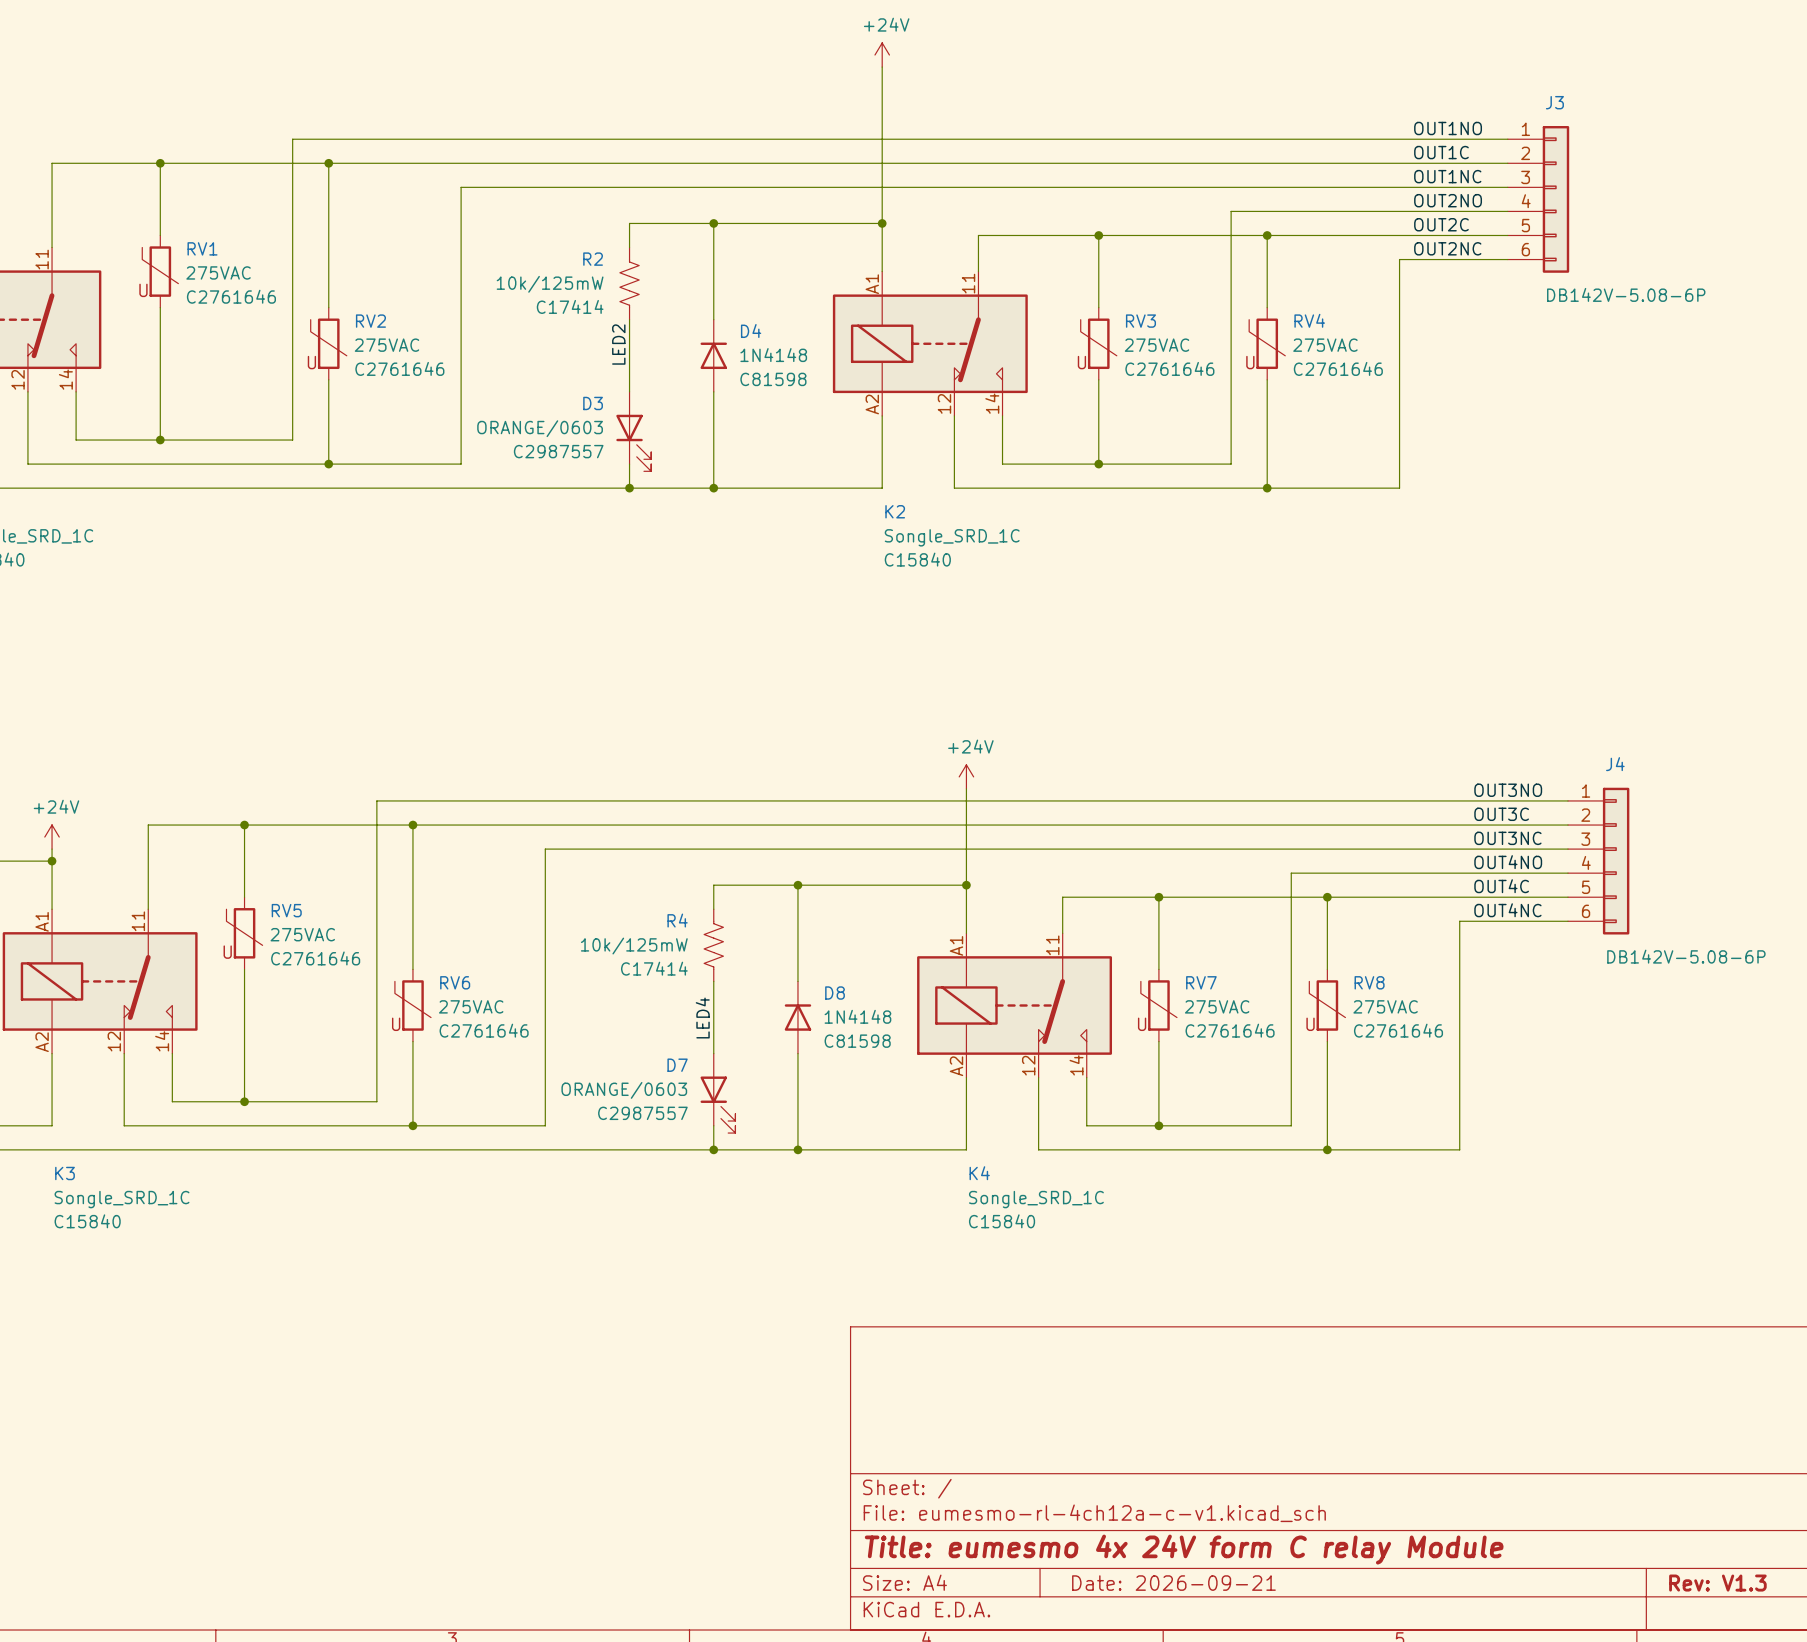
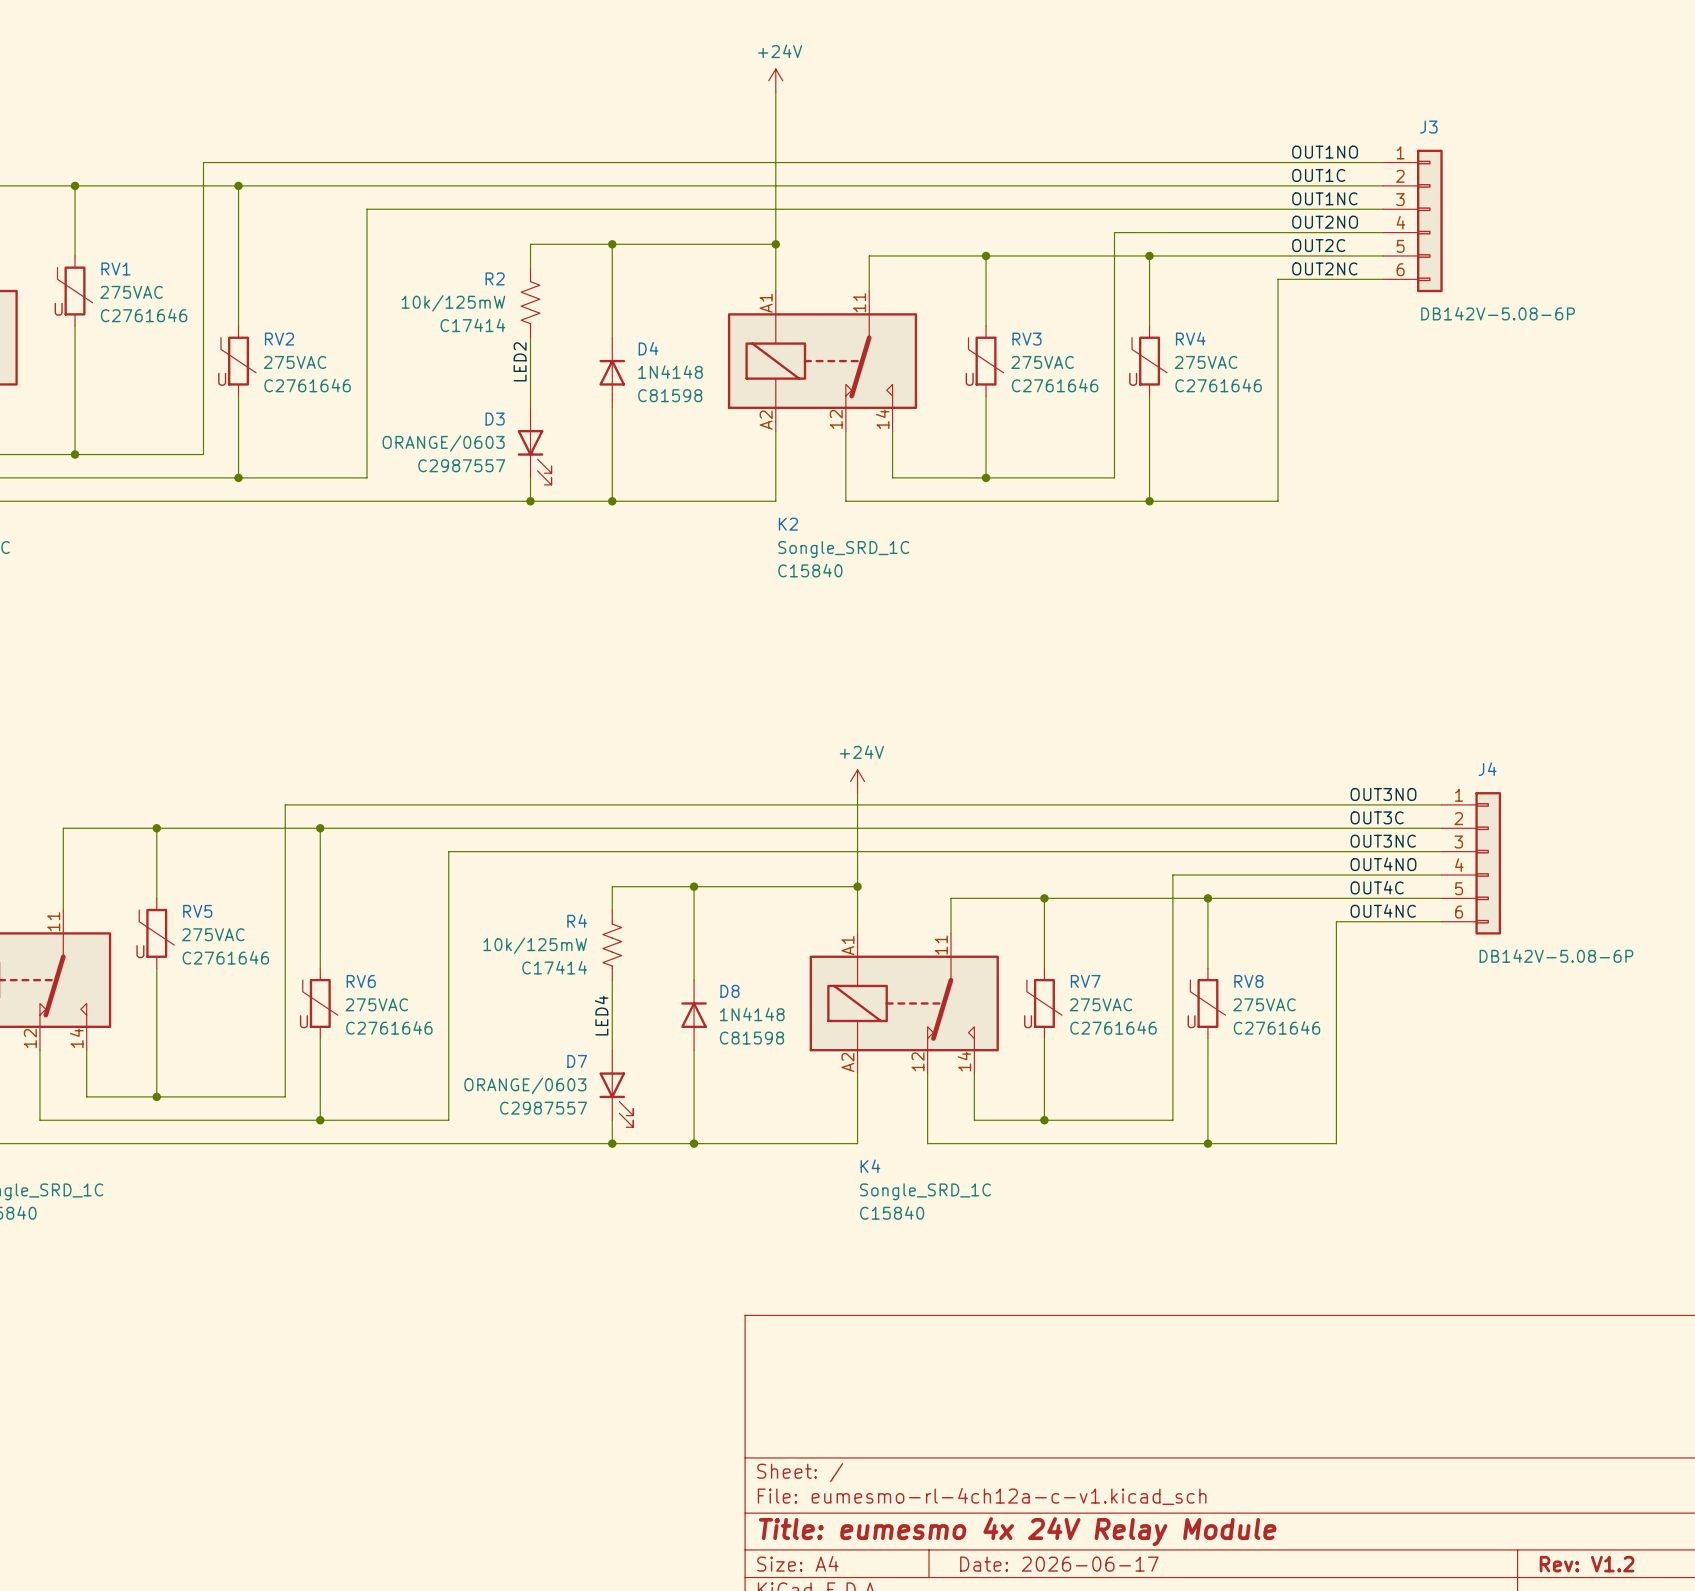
title block: Title: eumesmo 4x 24V form C relay Module (1184, 1549) -> Title: eumesmo 4x 24V Relay Module (1017, 1531)
title block: Date: 2026-09-21 (1173, 1583) -> Date: 2026-06-17 (1059, 1564)
title block: Rev: V1.3 (1717, 1583) -> Rev: V1.2 (1587, 1564)

